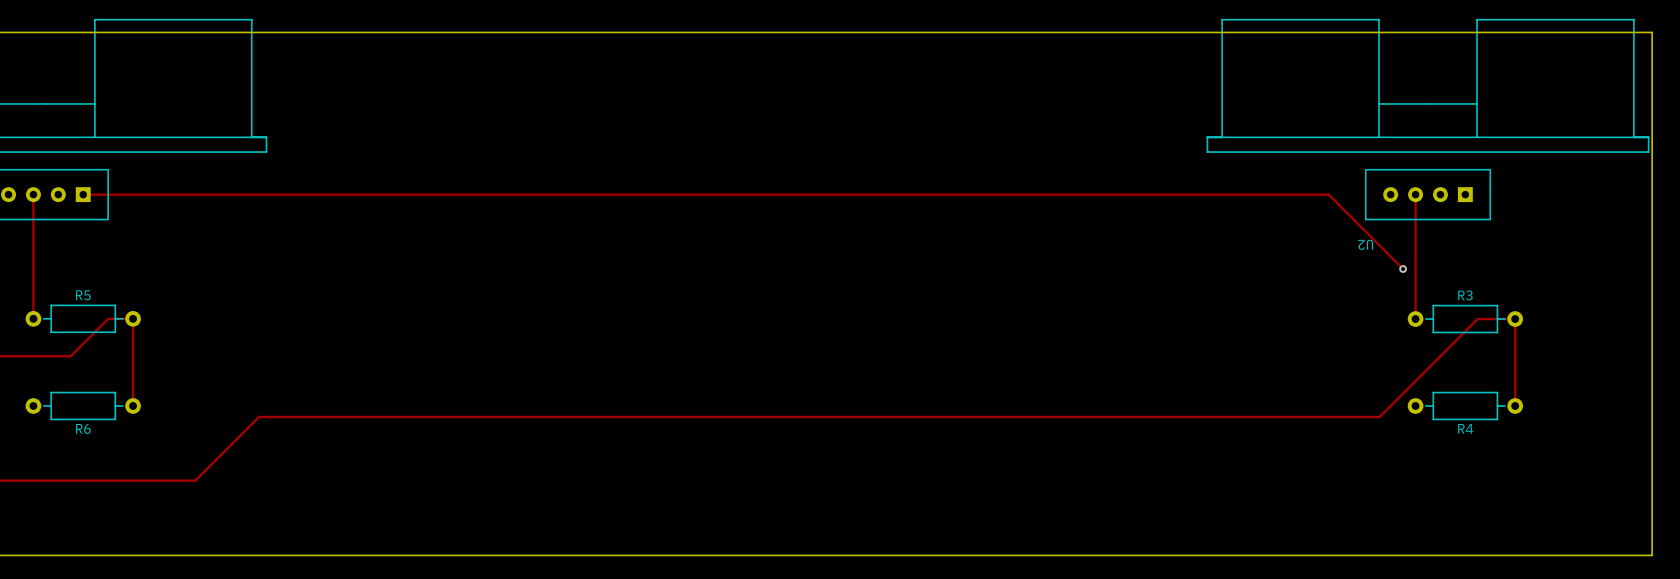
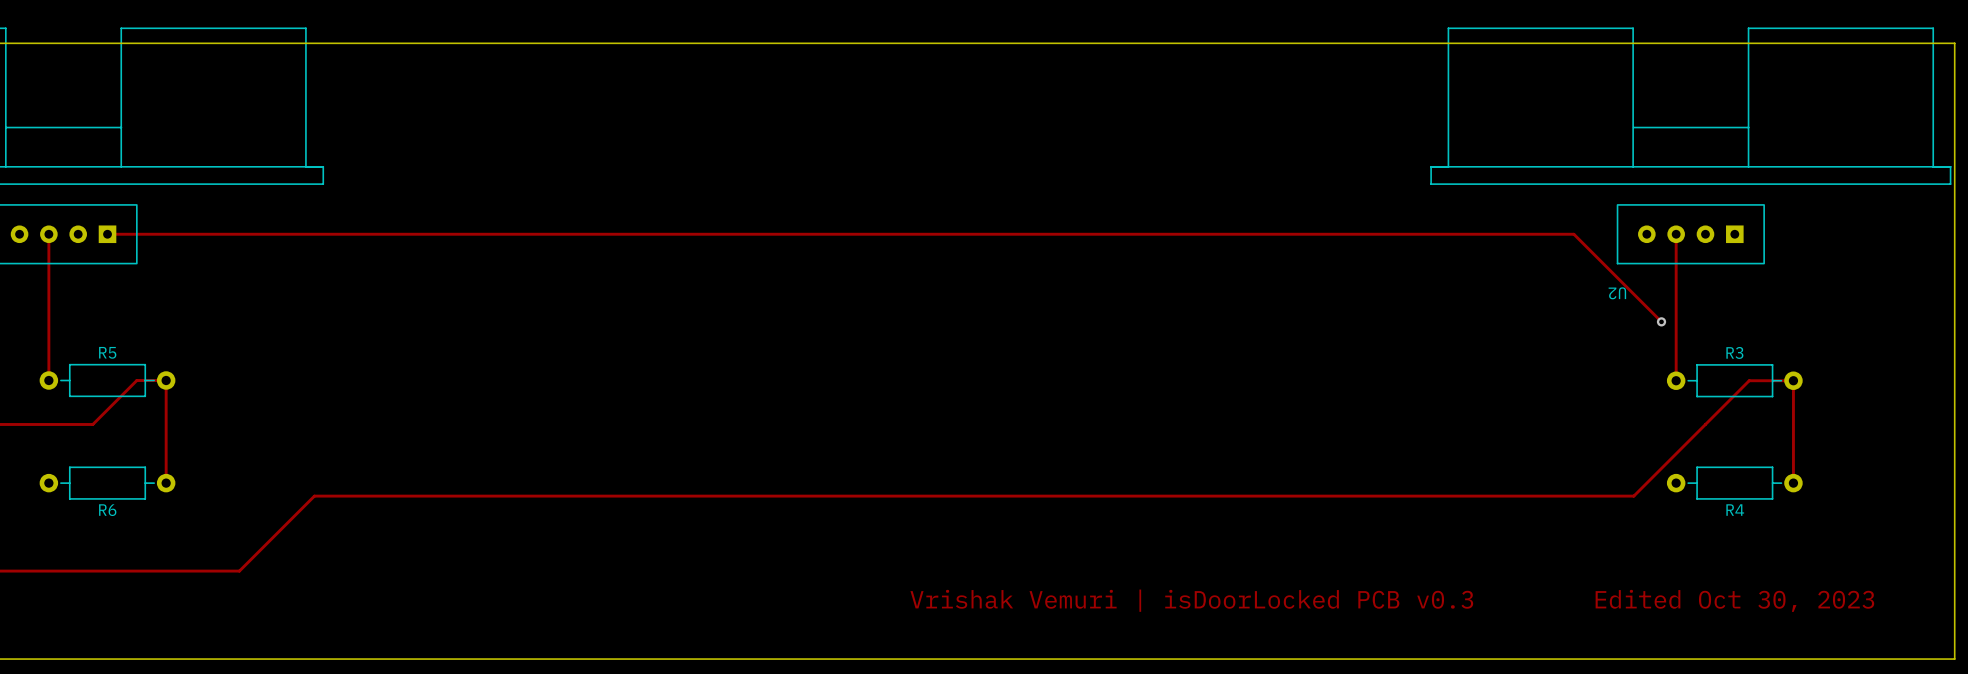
text: none -> Vrishak Vemuri | isDoorLocked PCB v0.3 (1191, 600)
text: none -> Edited Oct 30, 2023 (1734, 600)

